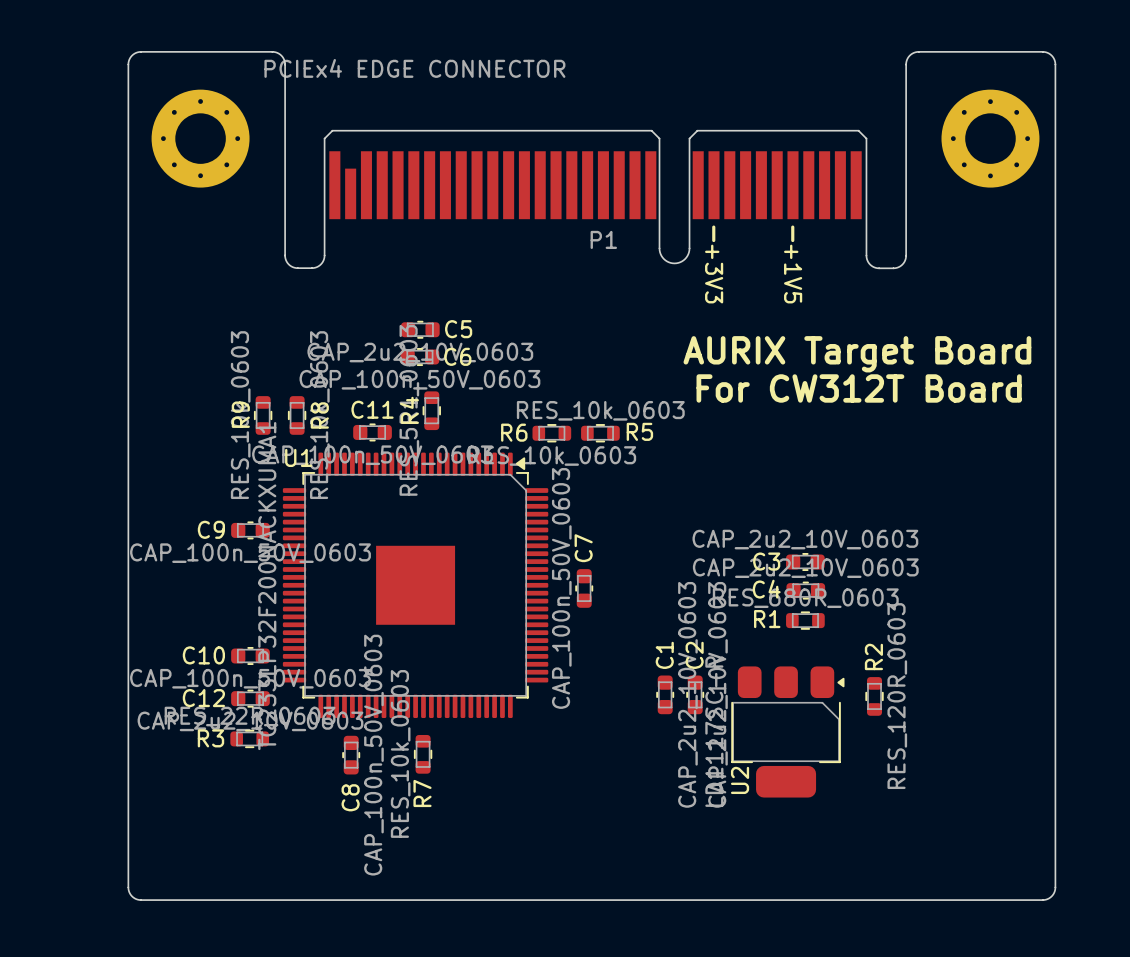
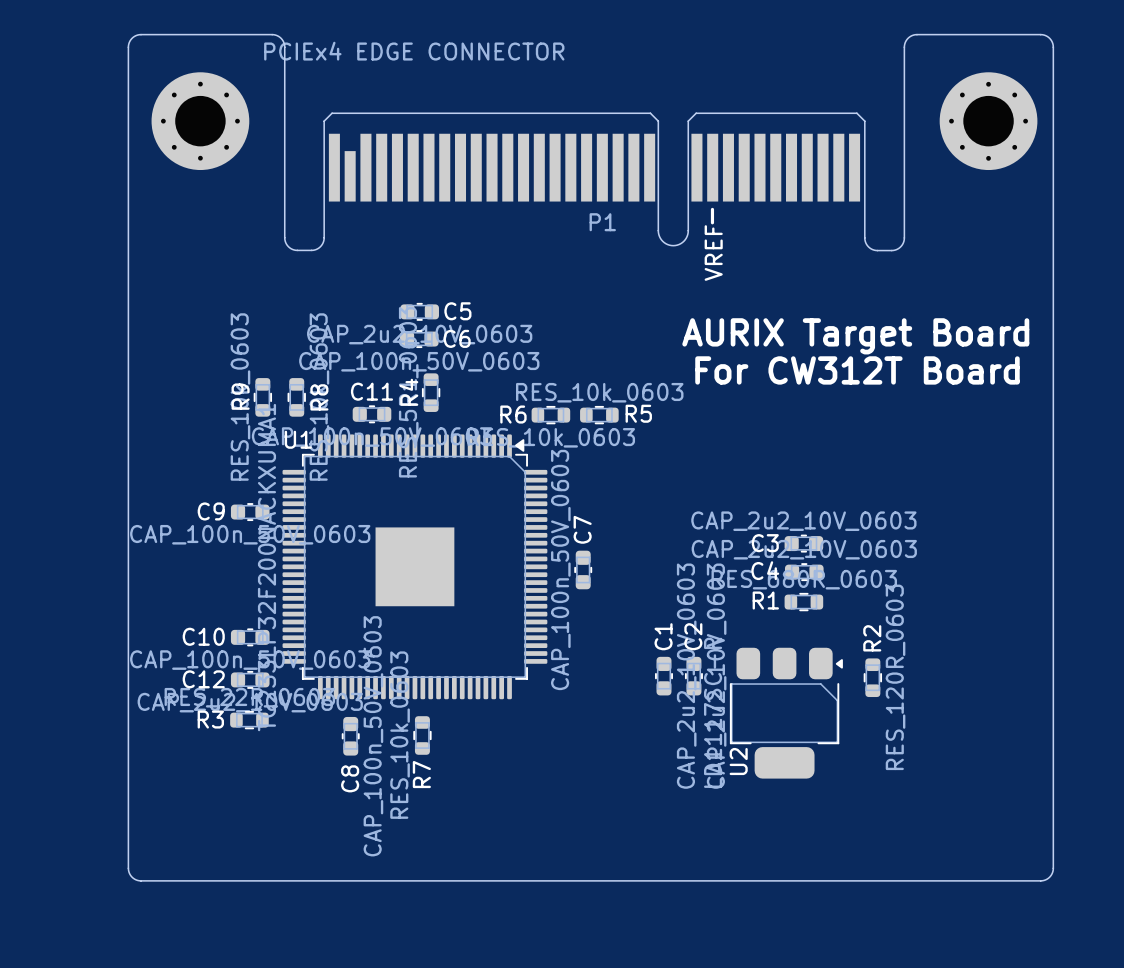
line: (792, 227) (792, 240) -> none
text: none -> VREF (713, 253)
text: +3V3 (714, 274) -> none
text: +1V5 (793, 274) -> none

